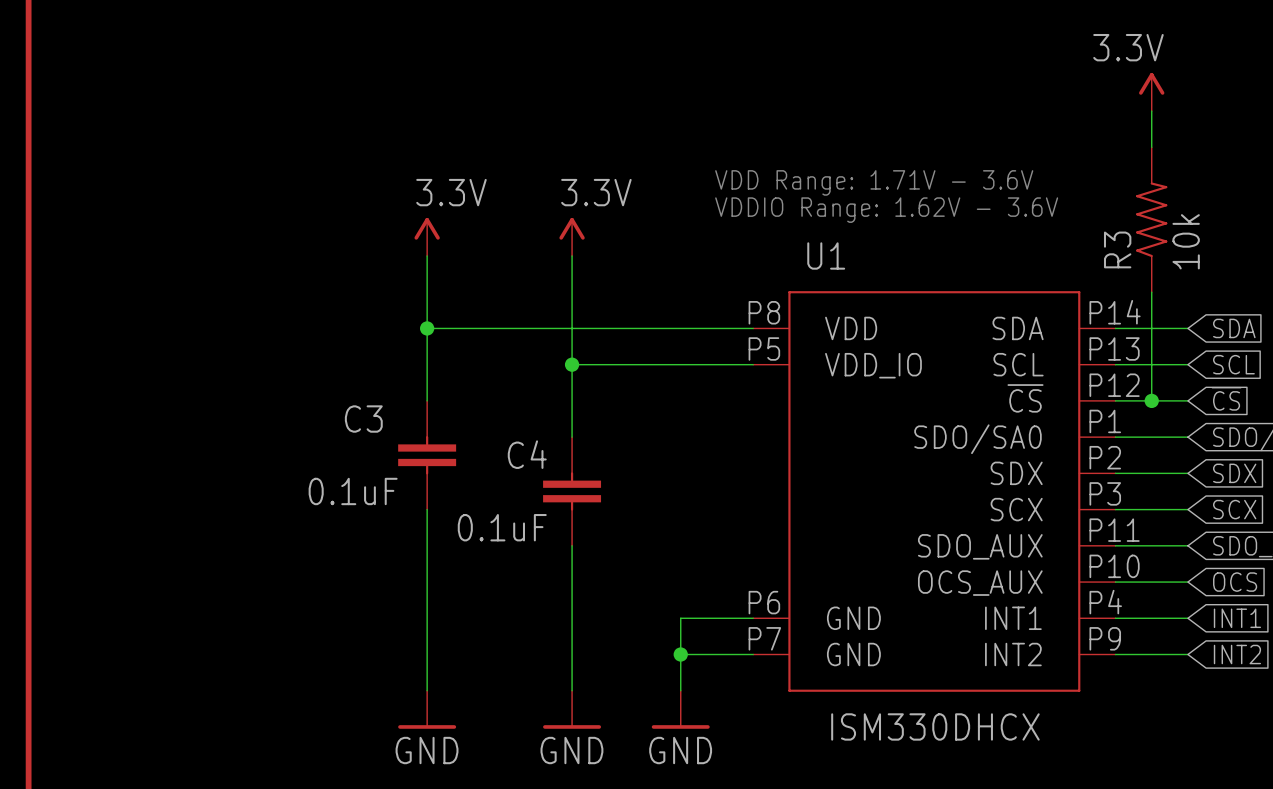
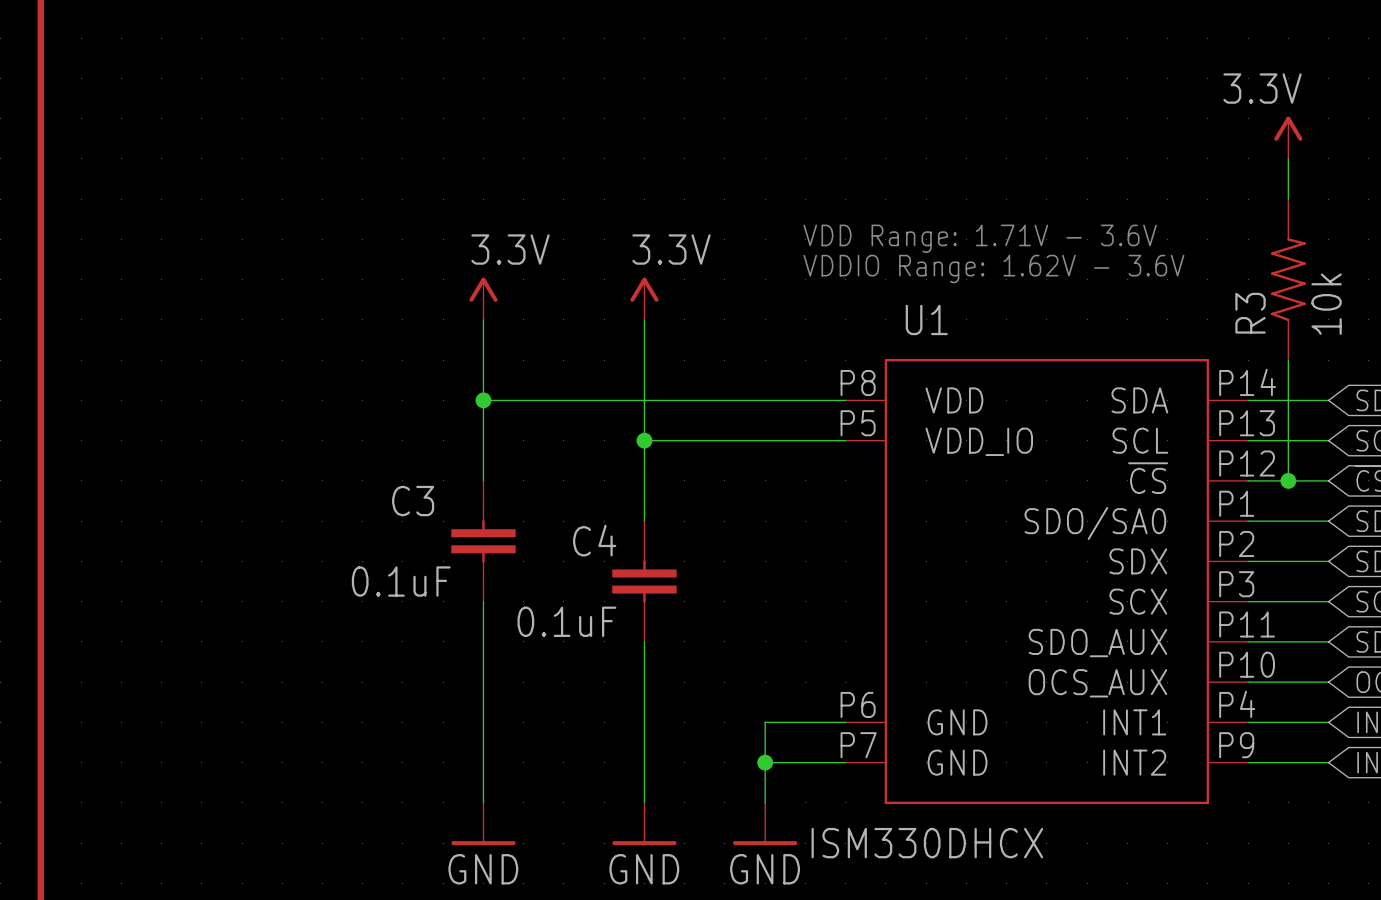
U1 value position: ISM330DHCX (935, 726) -> ISM330DHCX (927, 843)

